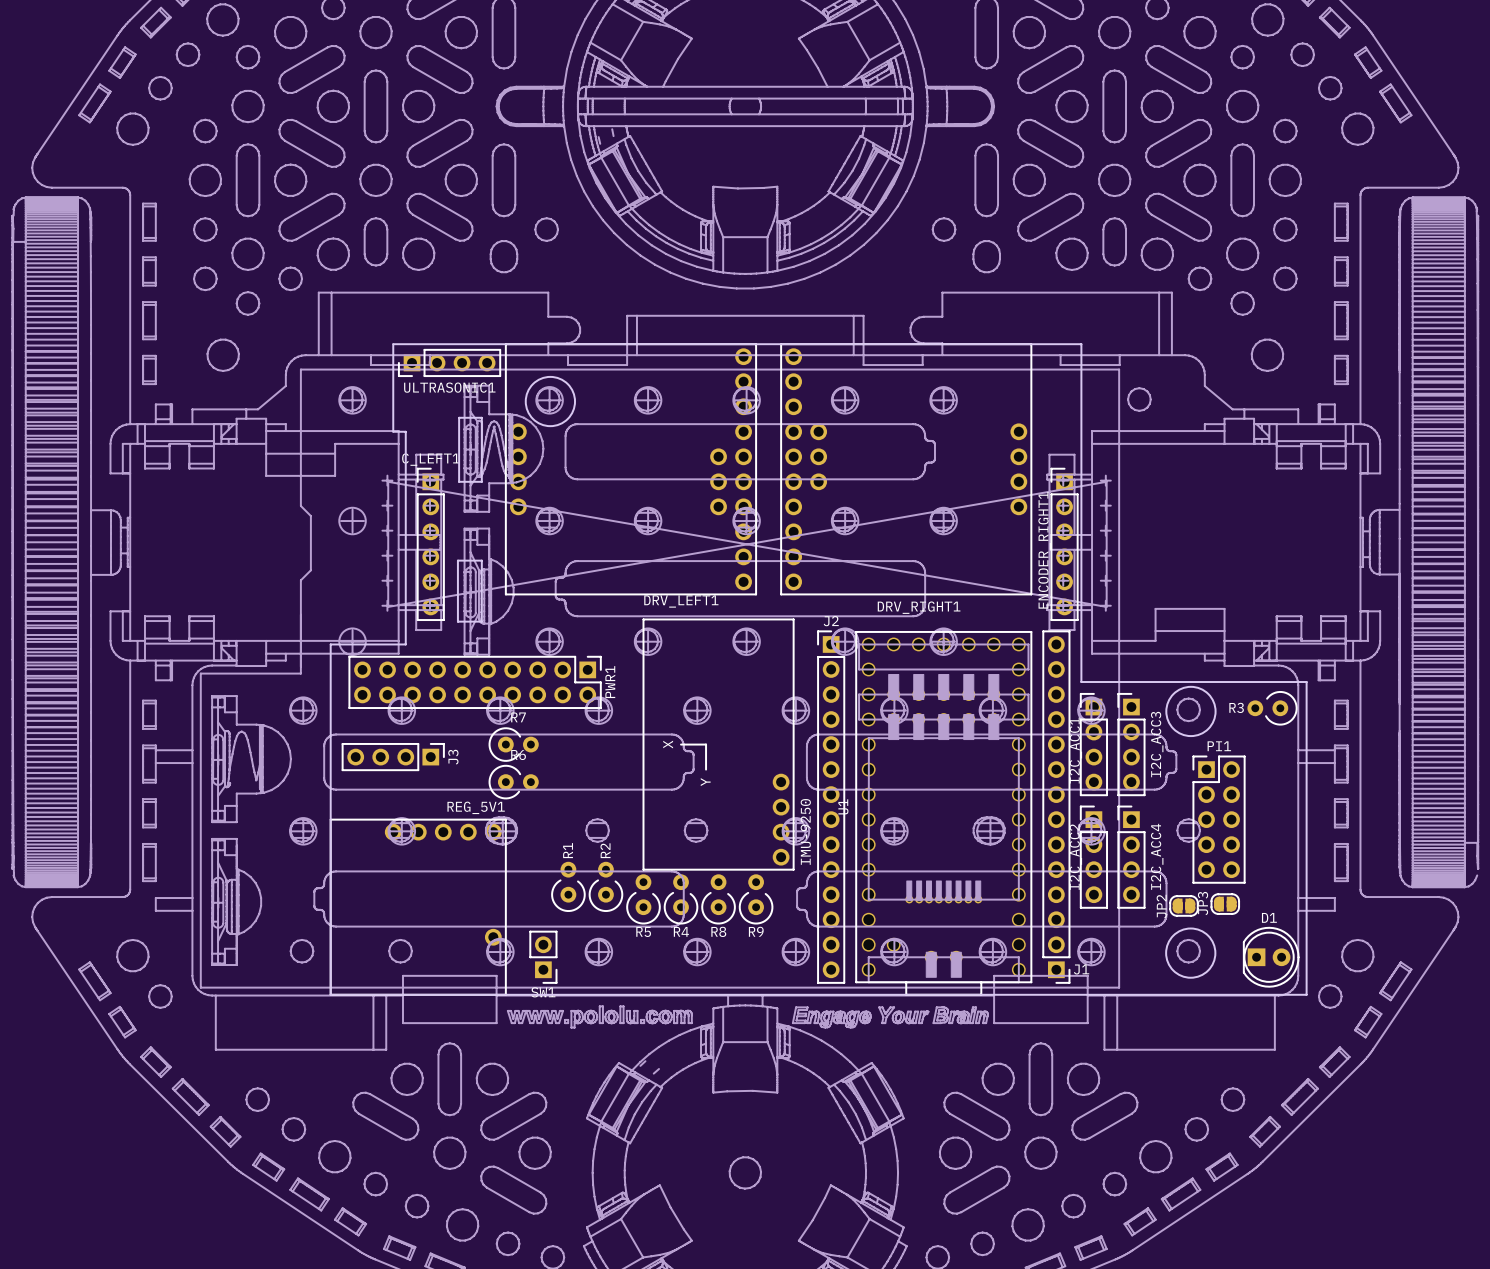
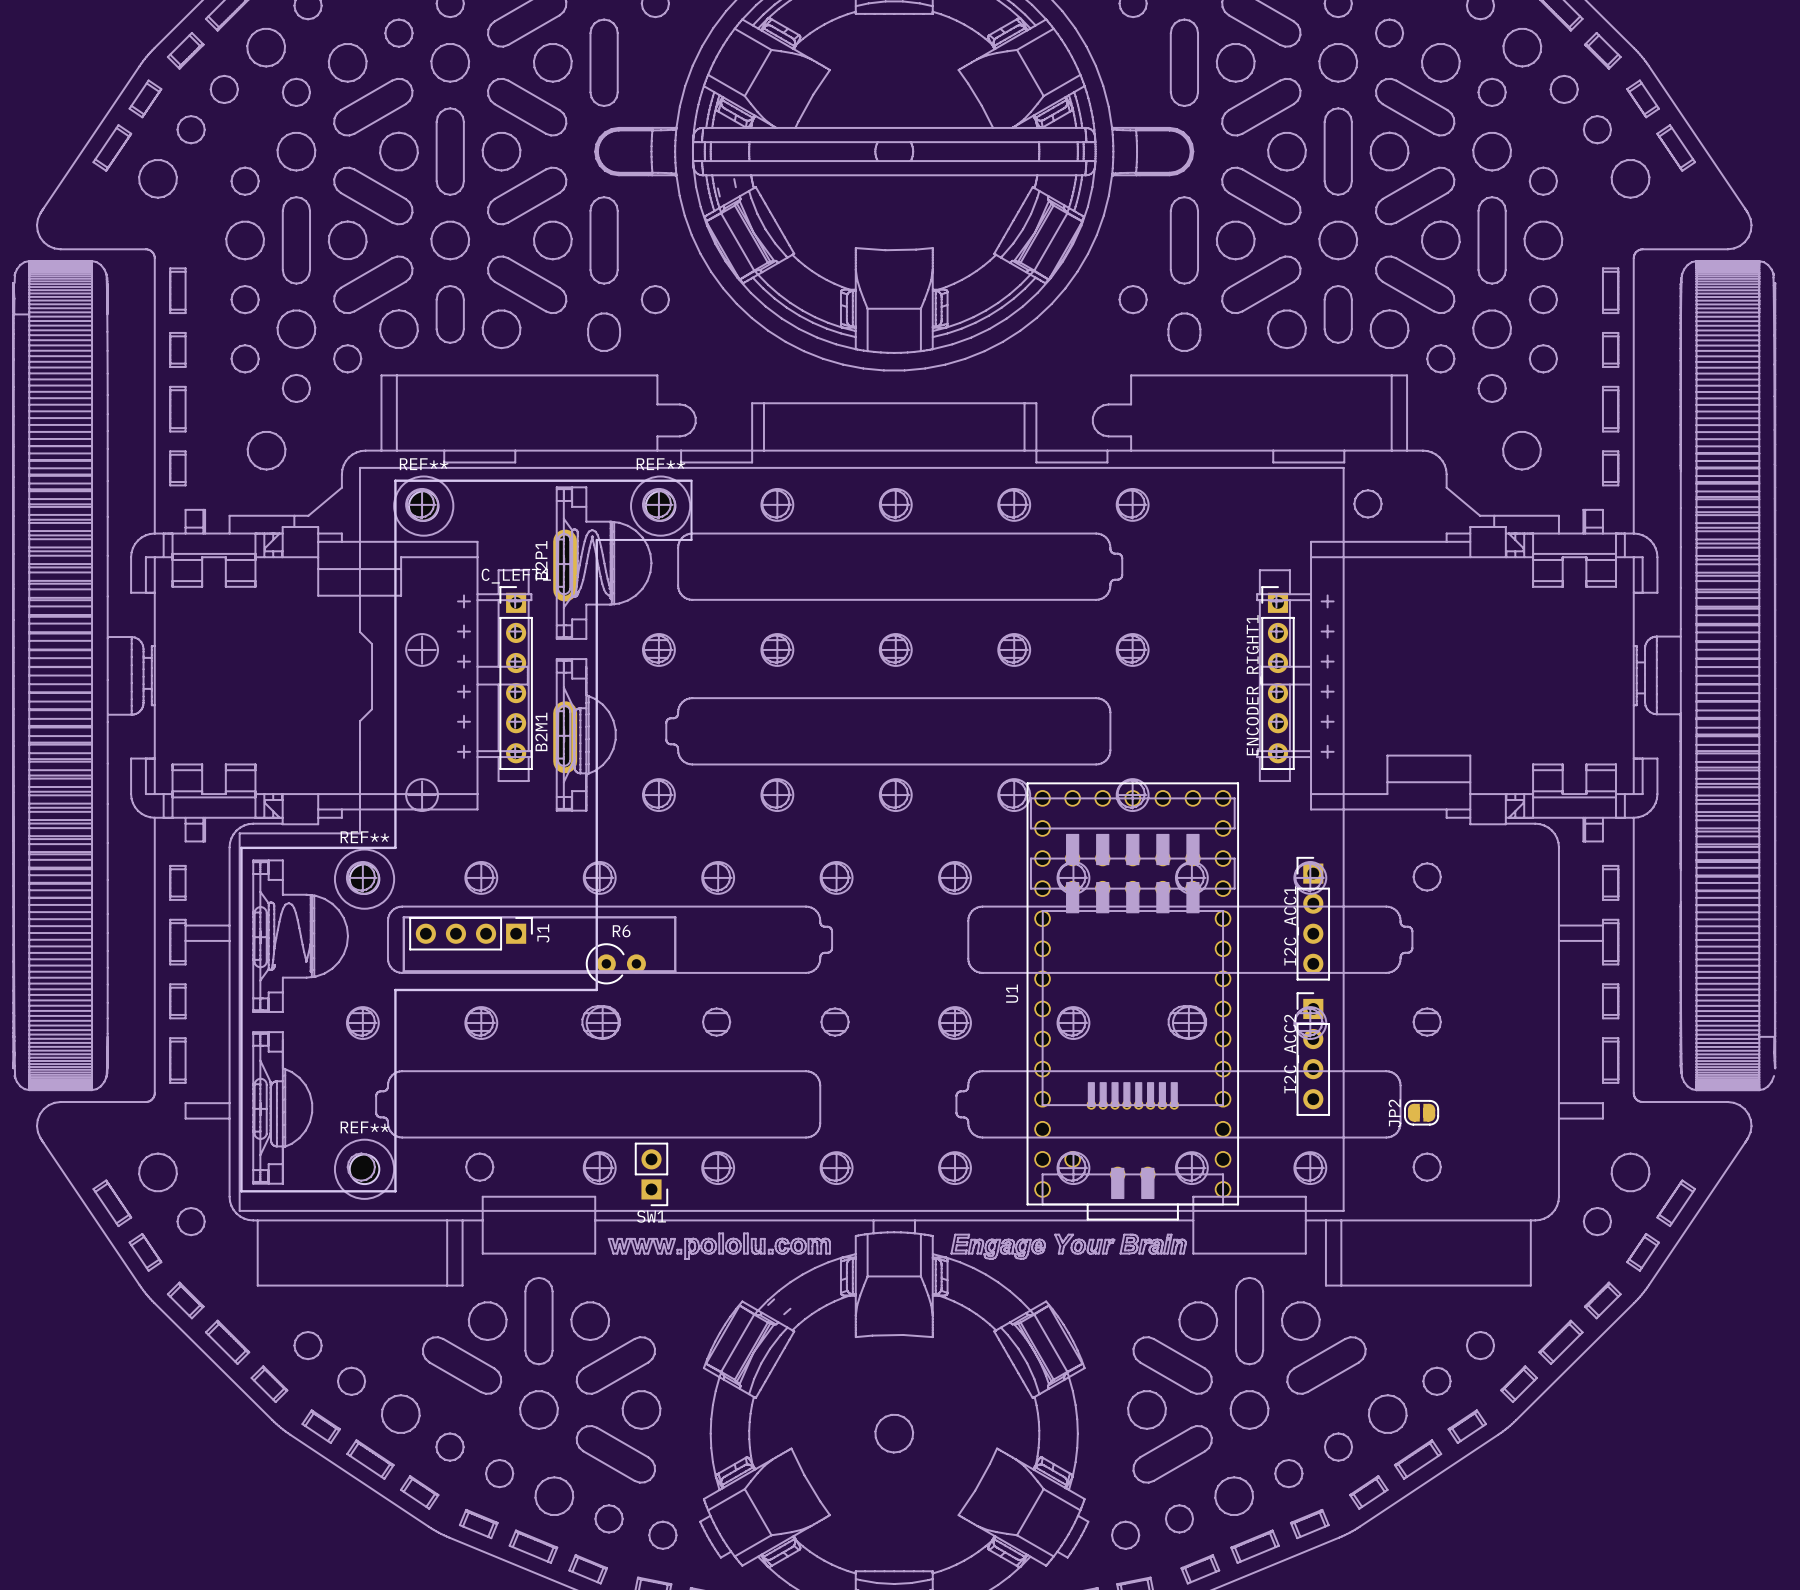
board edge: (393, 344) (393, 431) (405, 431) (405, 644) (330, 644) (330, 994) (1306, 994) (1306, 682) (1081, 682) (1081, 344) (393, 344) -> none
ULTRASONIC1: (449, 362) -> none
round board edge: [525, 376, 576, 427] -> none
board edge: none -> (395, 480) (395, 847) (241, 847) (241, 1191) (395, 1191) (395, 989) (596, 989) (596, 539) (691, 539) (691, 480) (395, 480)
REF**: none -> (423, 506)
REF**: none -> (660, 506)
board edge: (459, 417) (459, 481) (481, 481) (481, 417) (459, 417) -> none
B2P1: none -> (565, 565)
DRV_LEFT1: (630, 469) -> none
DRV_RIGHT1: (906, 469) -> none
line: (388, 481) (1106, 606) (1106, 481) (388, 606) (388, 481) -> none
board edge: (457, 560) (457, 621) (481, 621) (481, 560) (457, 560) -> none
B2M1: none -> (565, 737)
PWR1: (475, 682) -> none
round board edge: [1166, 686, 1216, 737] -> none
R3: (1272, 708) -> none
REF**: none -> (364, 879)
line: none -> (403, 917) (403, 971) (675, 971) (675, 917) (403, 917)
R7: (513, 744) -> none
IMU-9250: (718, 744) -> none
I2C_ACC3: (1131, 744) -> none
J3 name: J3 (453, 757) -> J1 (543, 933)
J2: (831, 807) -> none
J1: (1056, 807) -> none
PI1: (1219, 819) -> none
I2C_ACC4: (1131, 857) -> none
R1: (568, 886) -> none
R2: (605, 886) -> none
R5: (643, 899) -> none
R4: (681, 899) -> none
R8: (718, 899) -> none
R9: (756, 899) -> none
JP3: (1225, 904) -> none
REG_5V1: (418, 907) -> none
round board edge: [1165, 928, 1216, 979] -> none
REF**: none -> (364, 1169)
D1: (1271, 957) -> none

